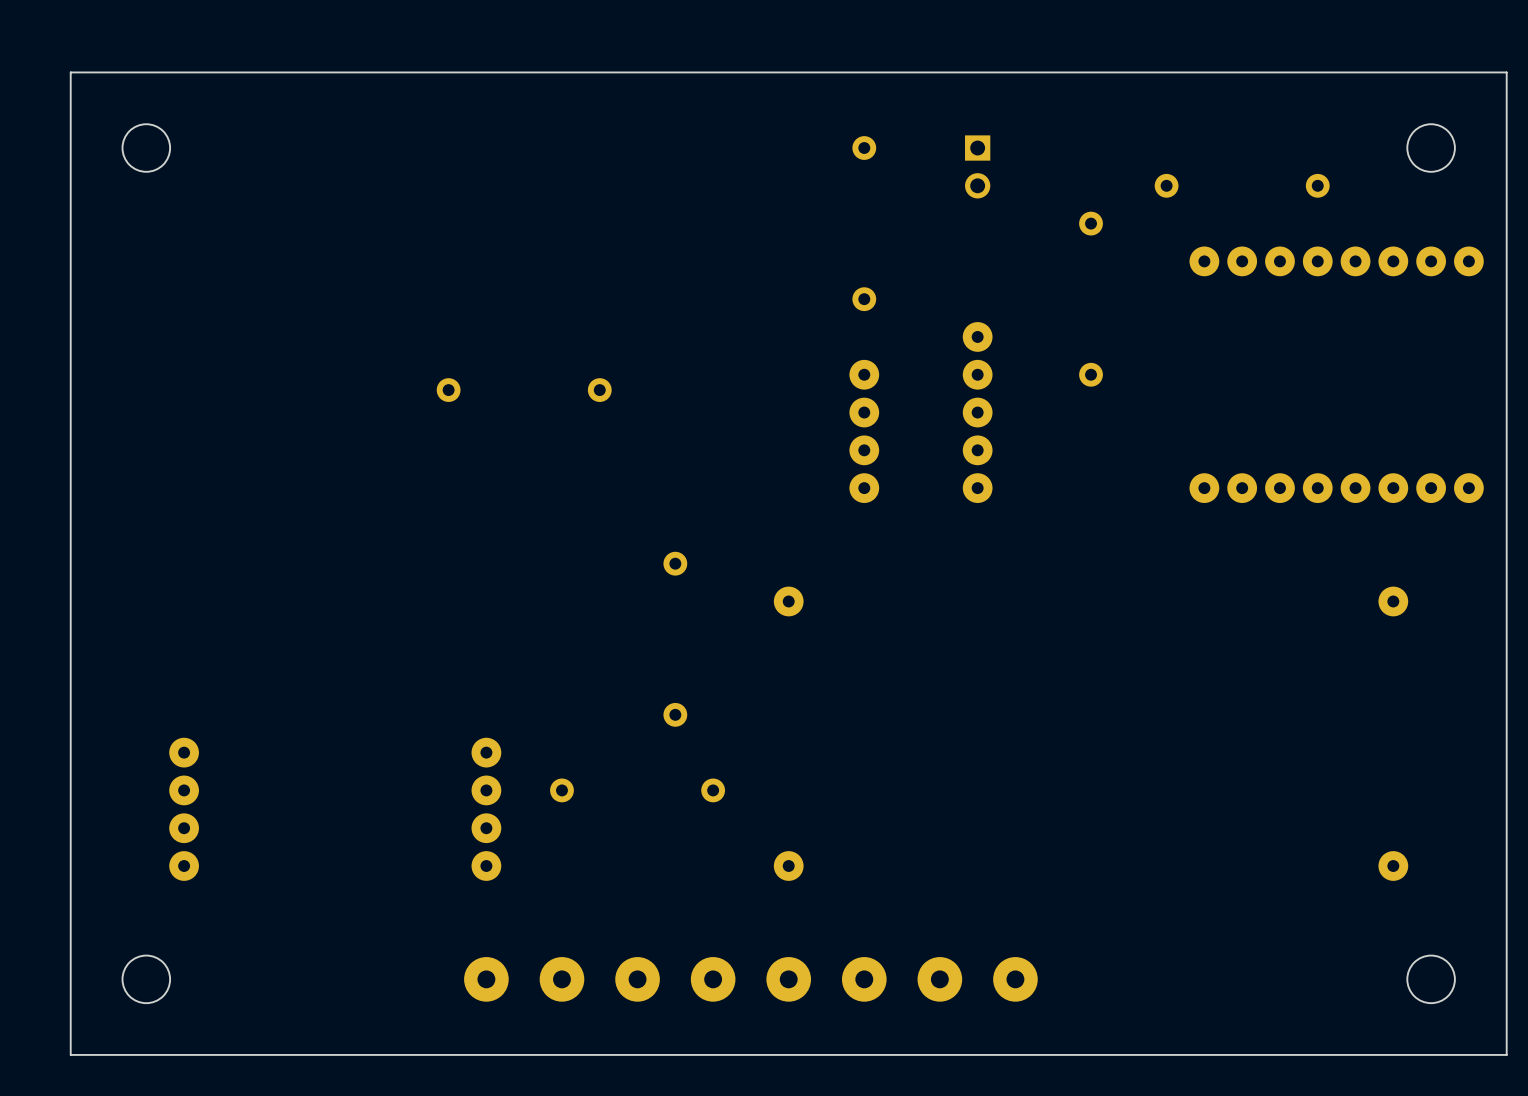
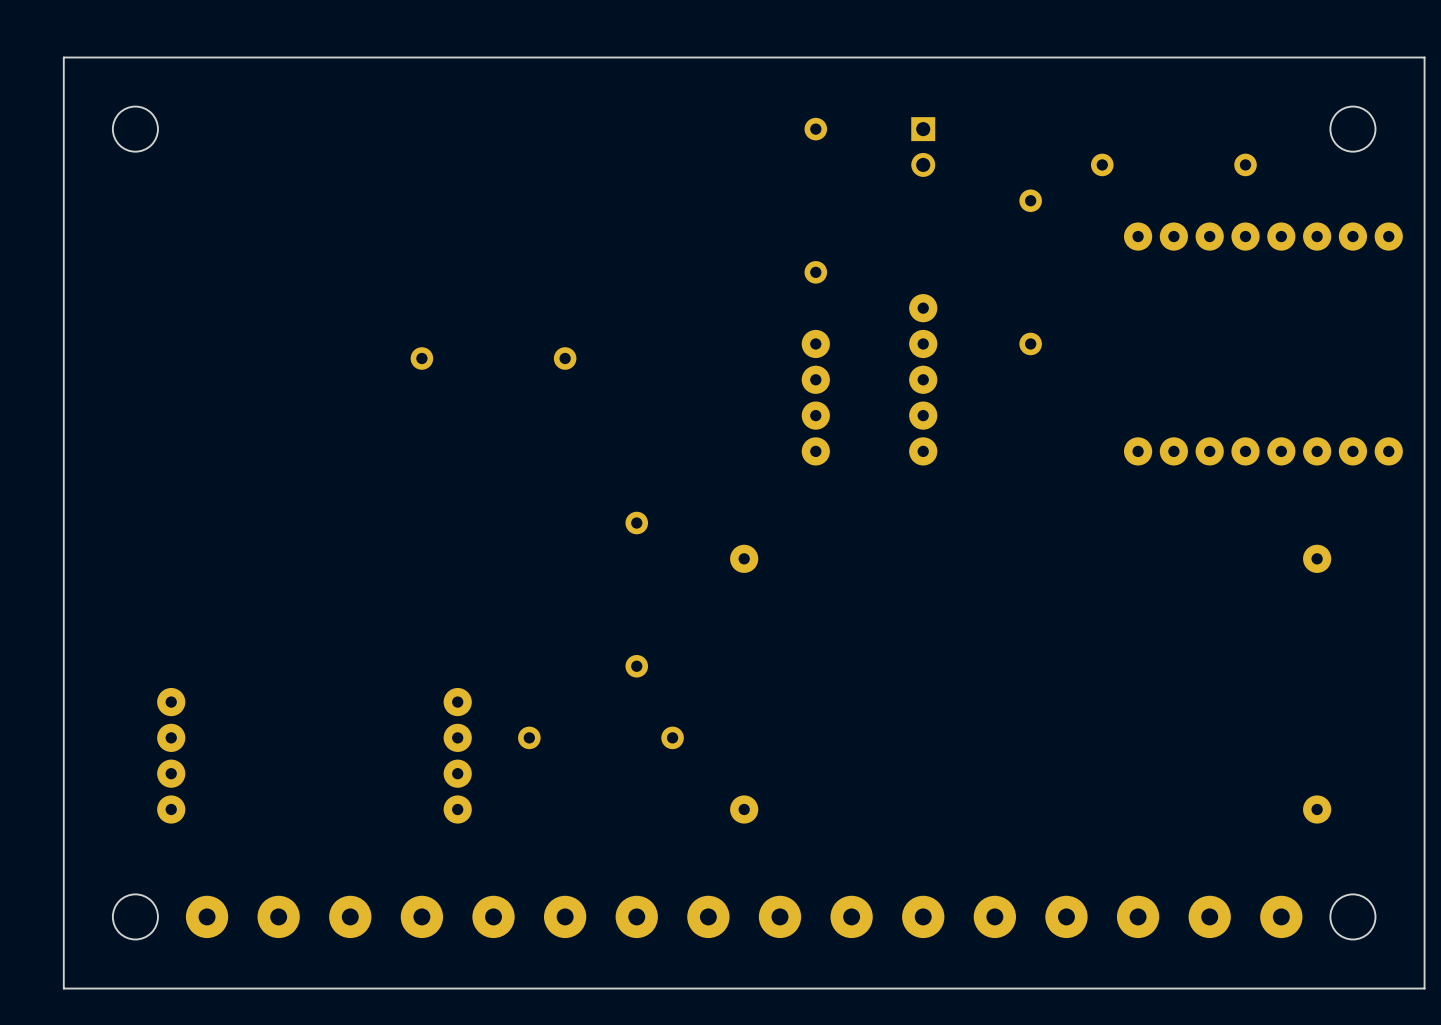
part: none -> (314, 916)
part position: (599, 979) -> (600, 916)
part position: (902, 979) -> (887, 916)
part: none -> (1173, 916)

